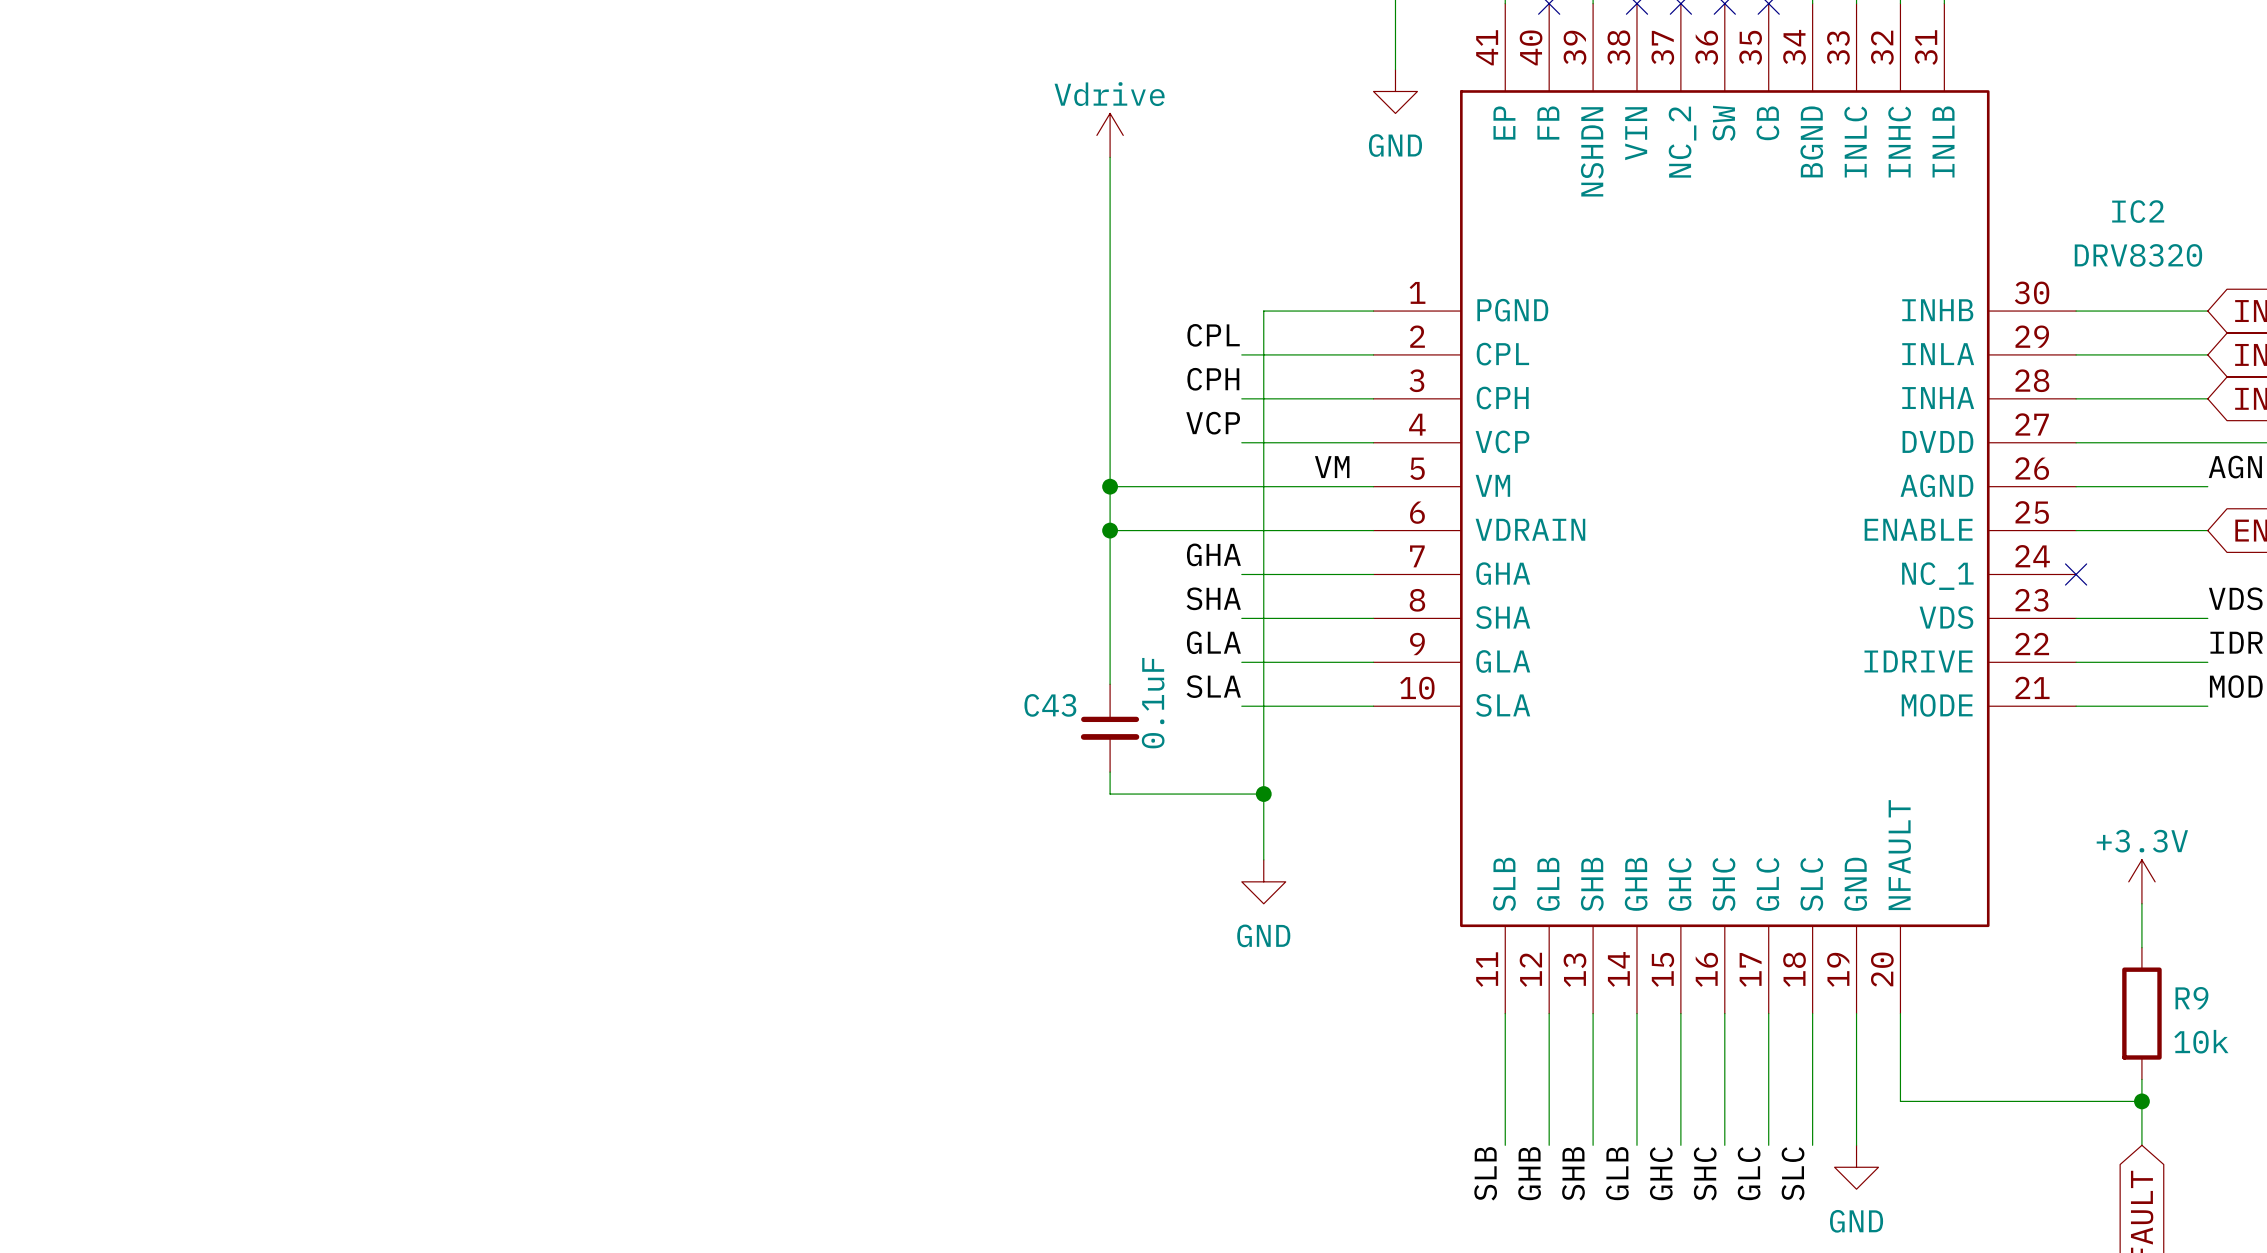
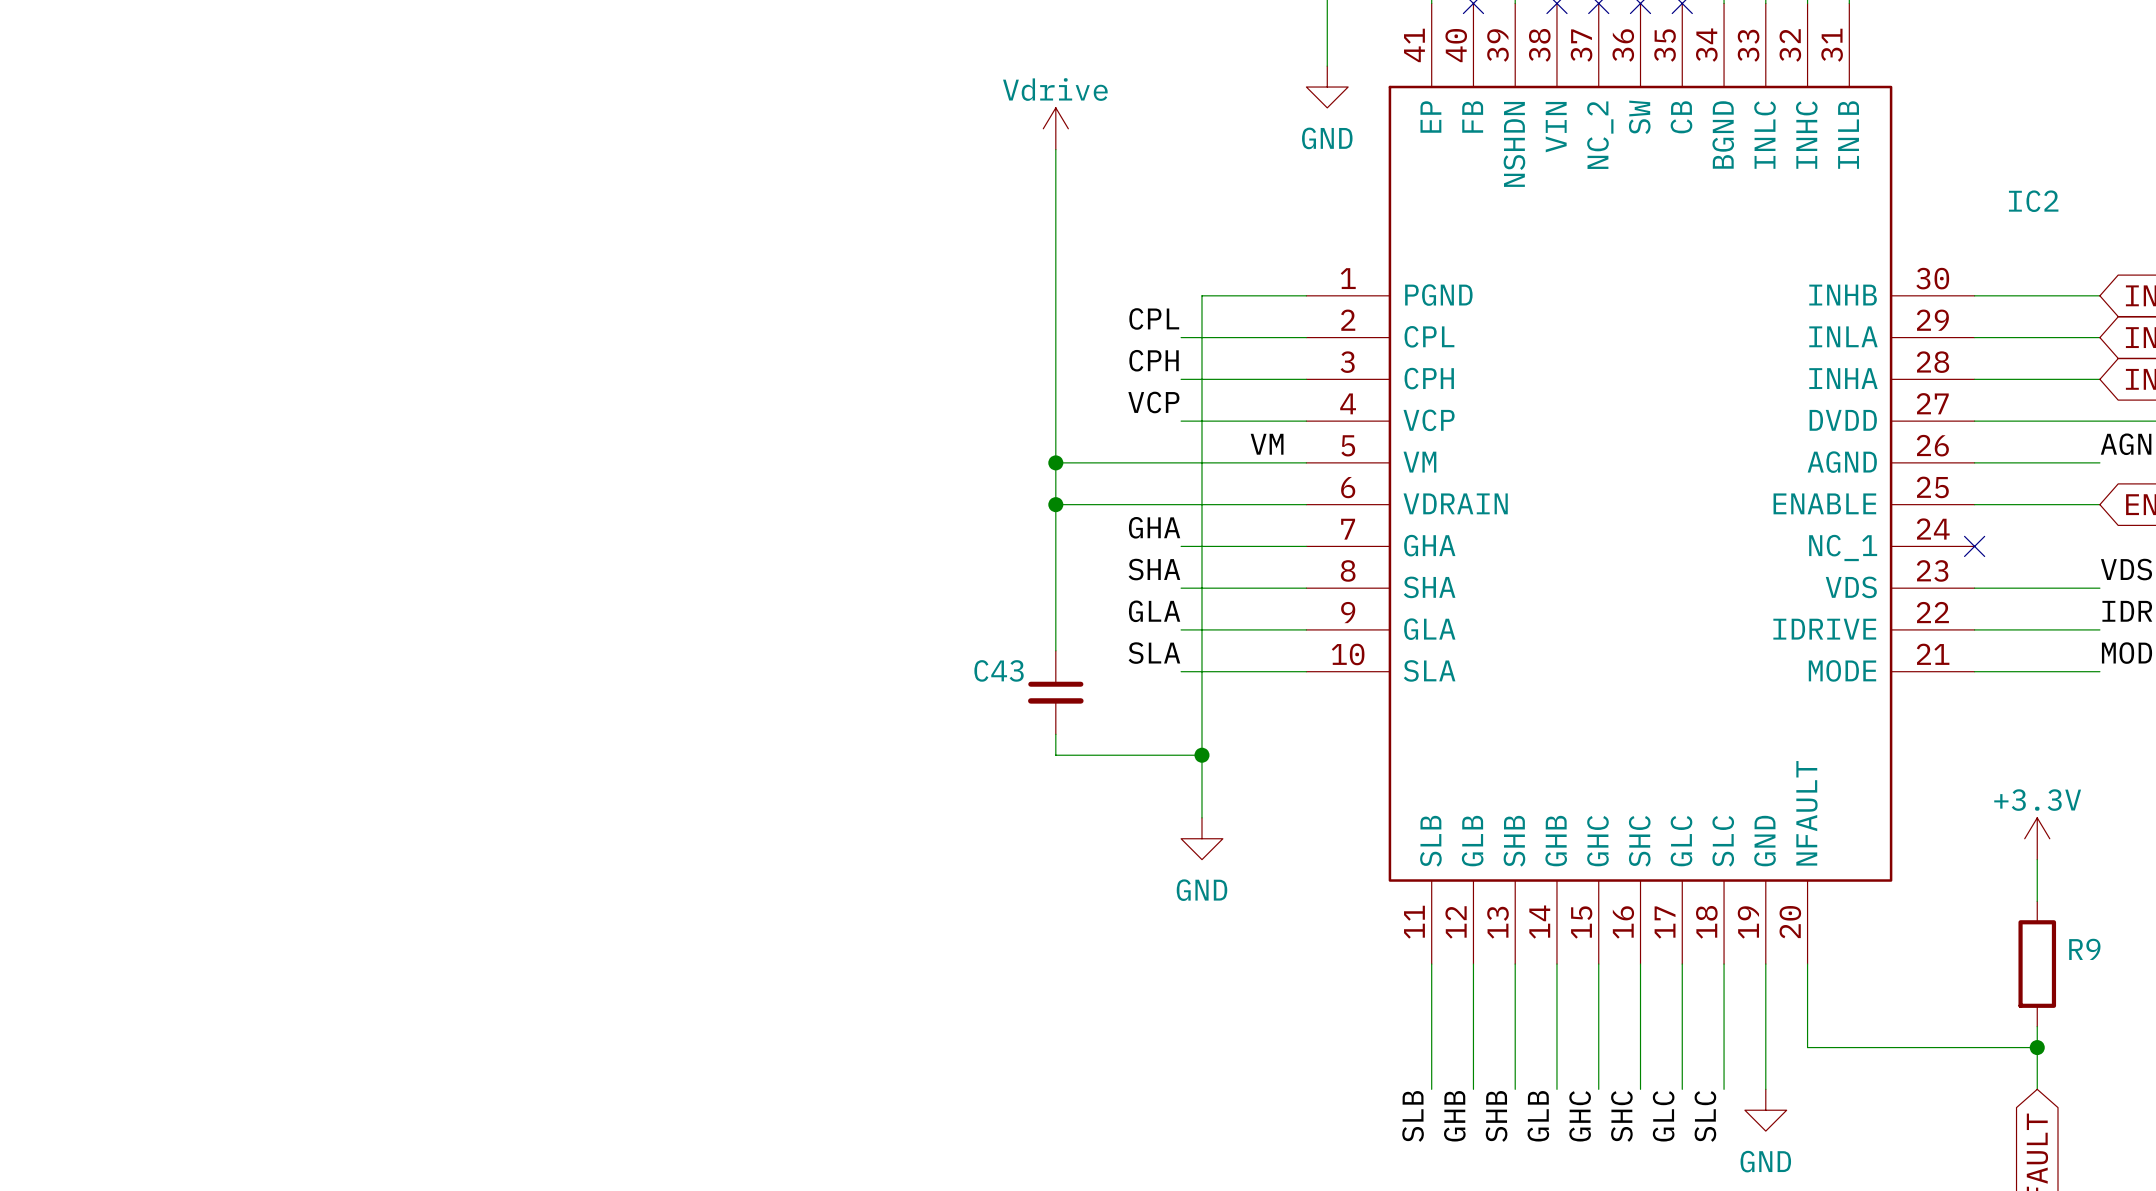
IC2 value: DRV8320 (2138, 255) -> none
C43 value: 0.1uF (1153, 703) -> none
R9 value: 10k (2201, 1041) -> none

